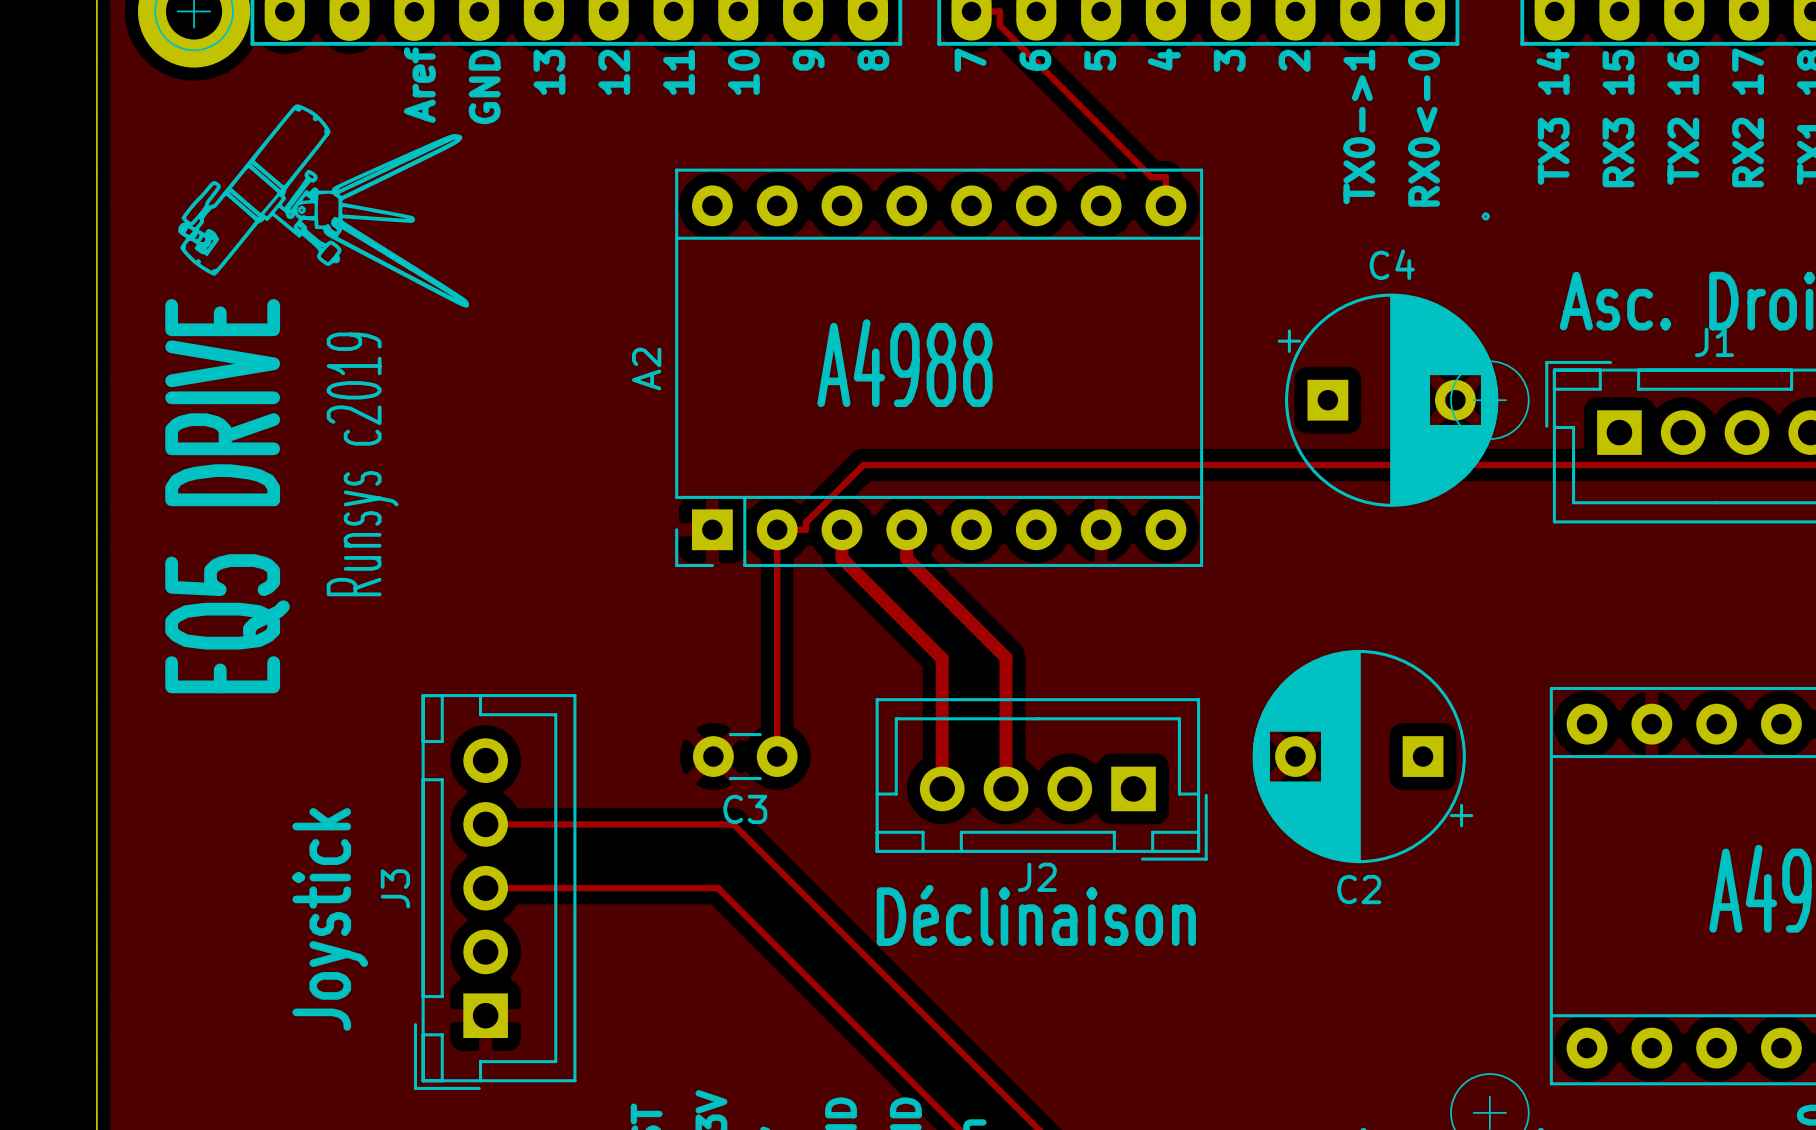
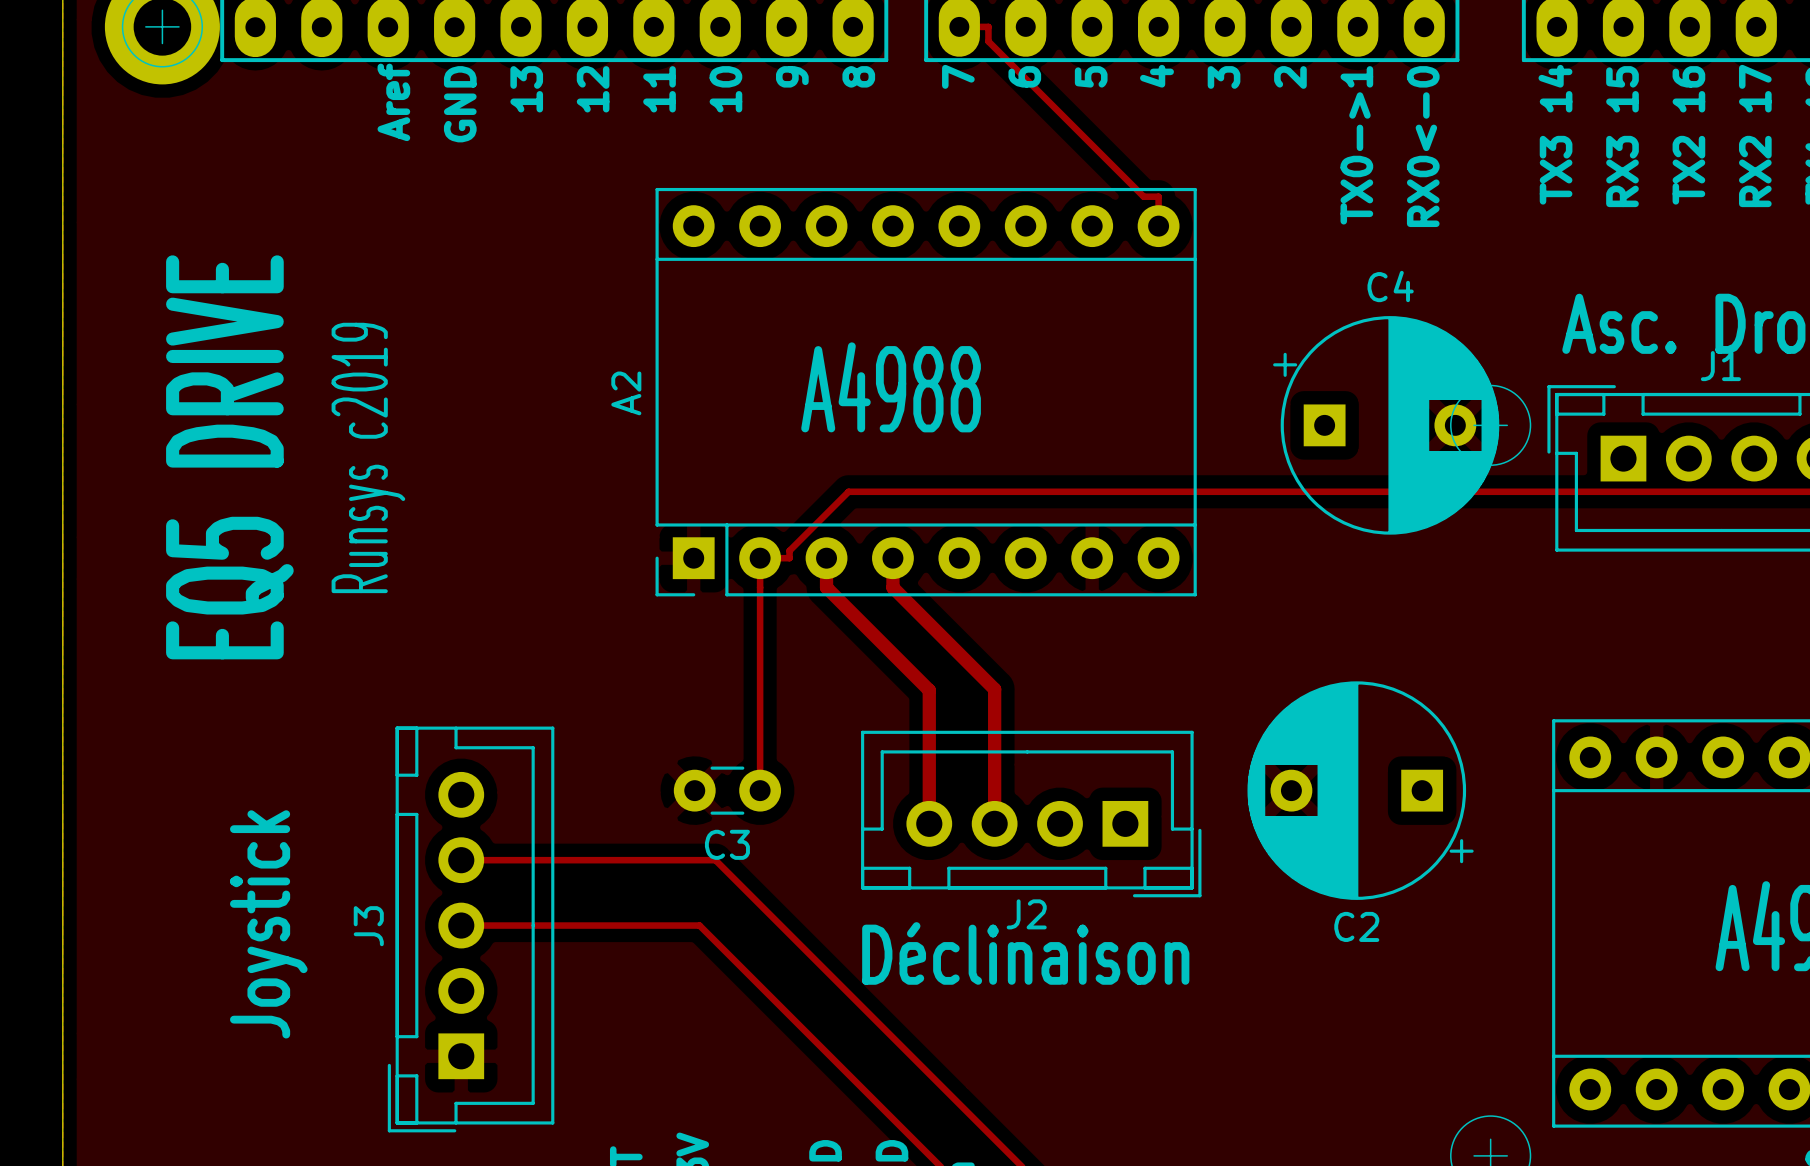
drawing: [178, 104, 470, 308] -> none
drawing: [1481, 212, 1491, 221] -> none
text position: Runsys c2019 (362, 464) -> Runsys c2019 (368, 457)
text position: EQ5 DRIVE (227, 496) -> EQ5 DRIVE (229, 457)
text position: Joystick (330, 919) -> Joystick (268, 924)

